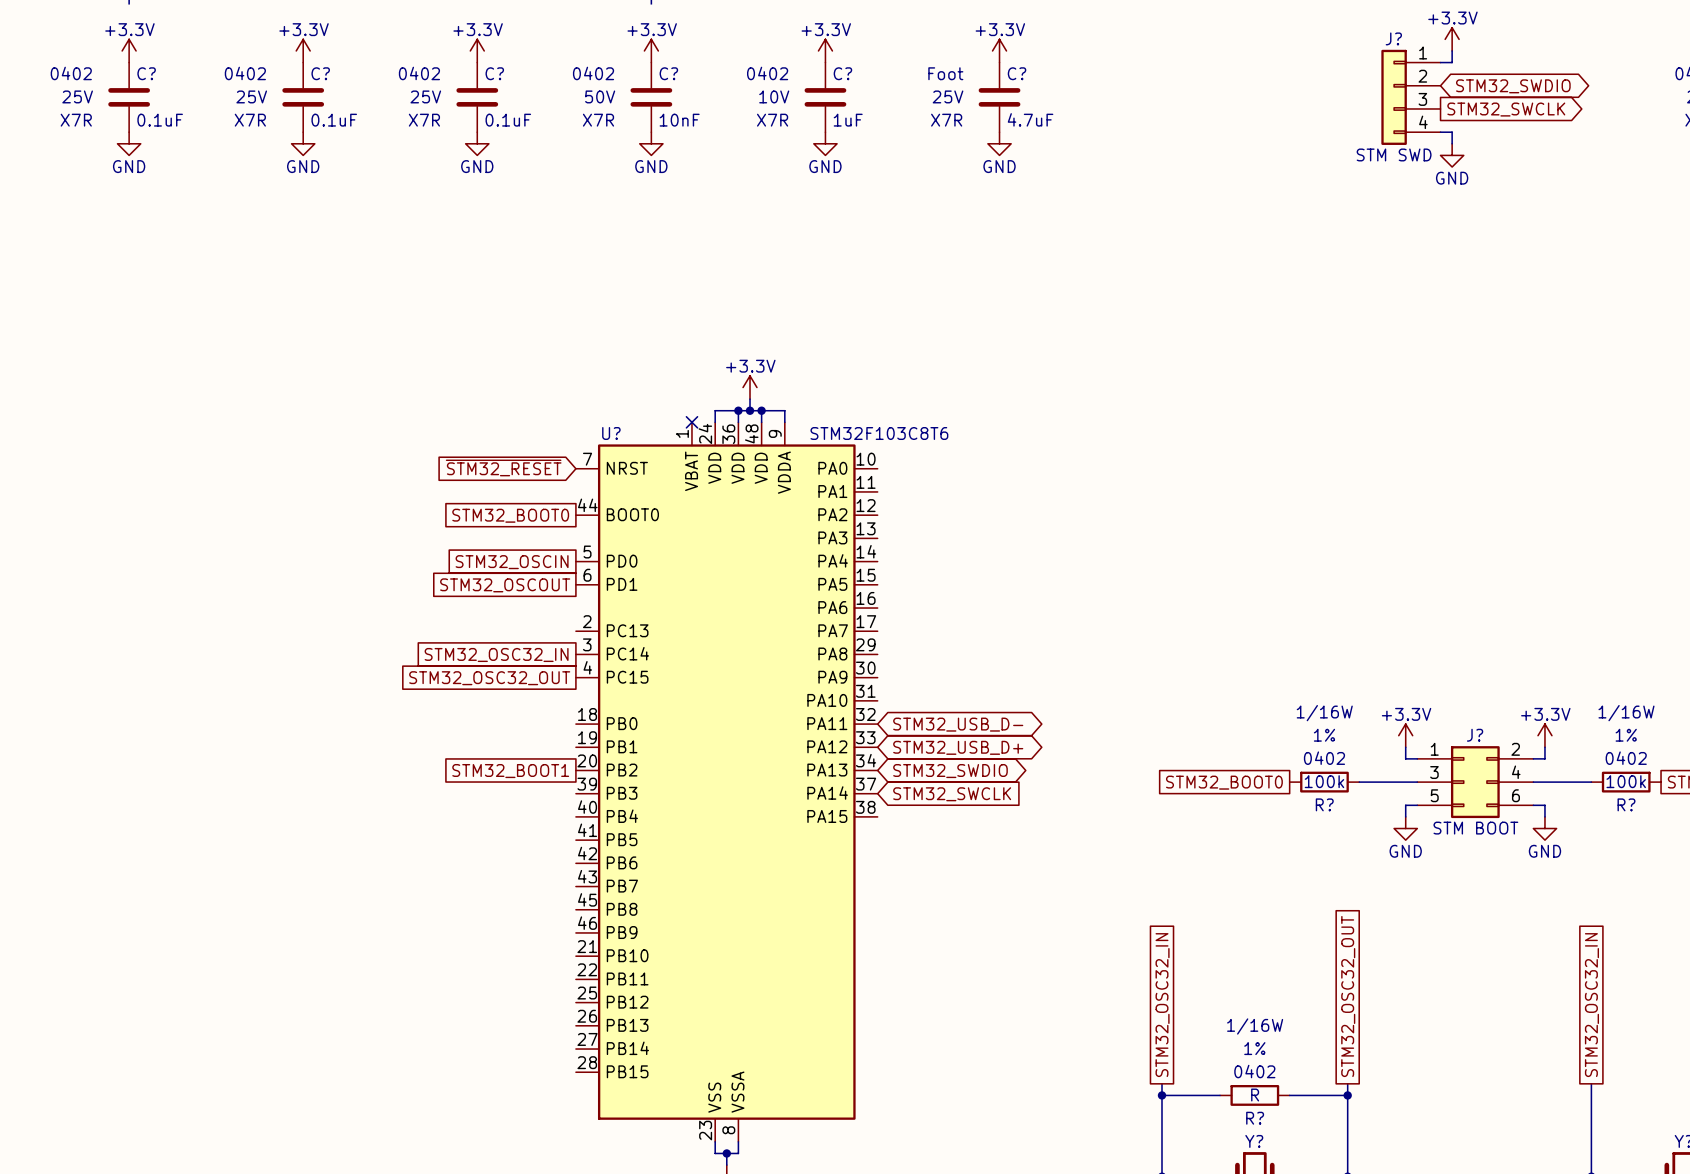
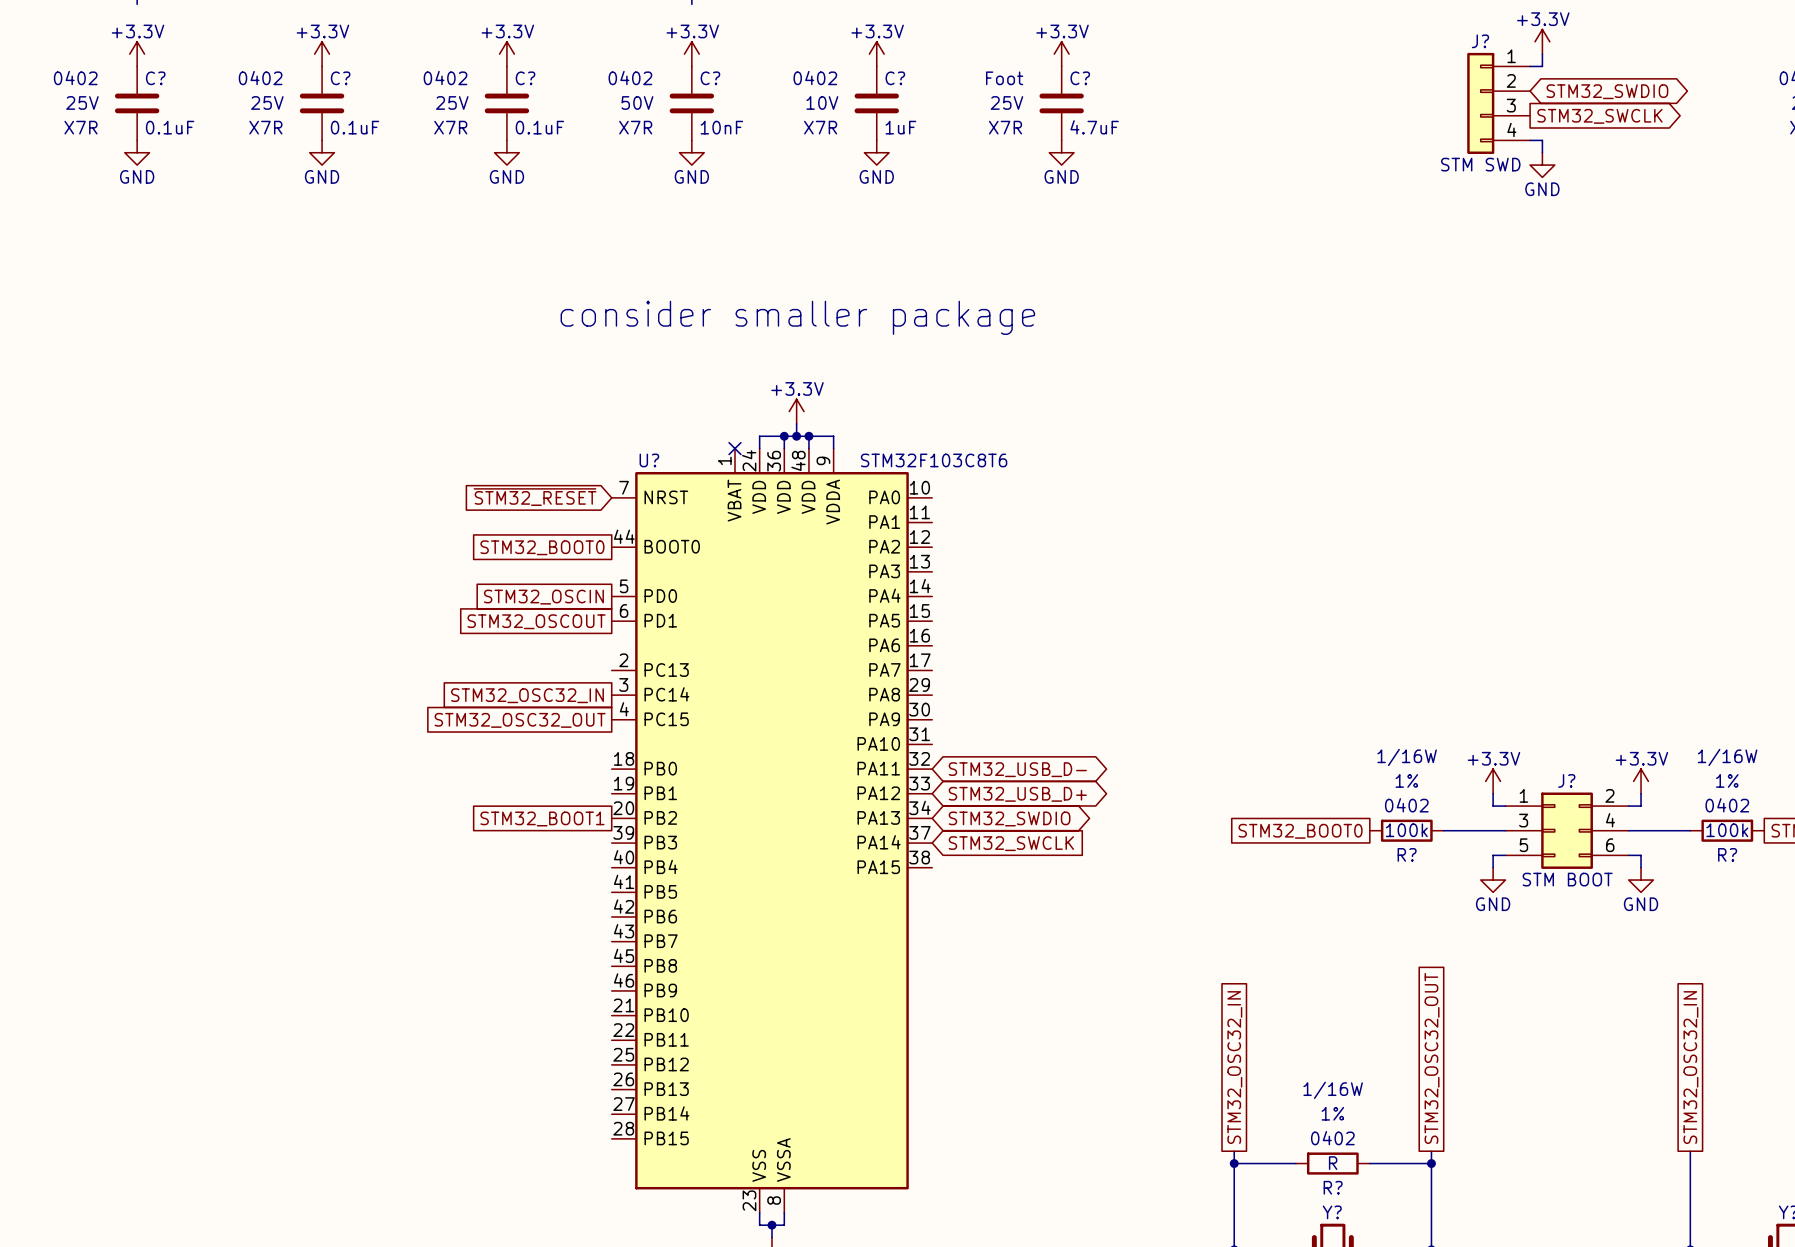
text: none -> consider smaller package (797, 317)

